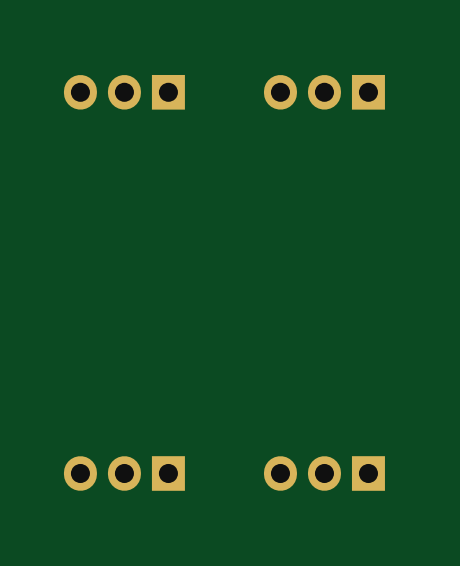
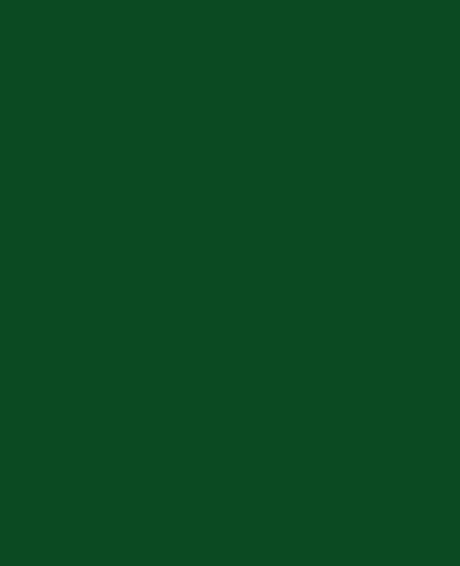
part: (124, 92) -> none
part: (324, 92) -> none
part: (124, 473) -> none
part: (324, 473) -> none

